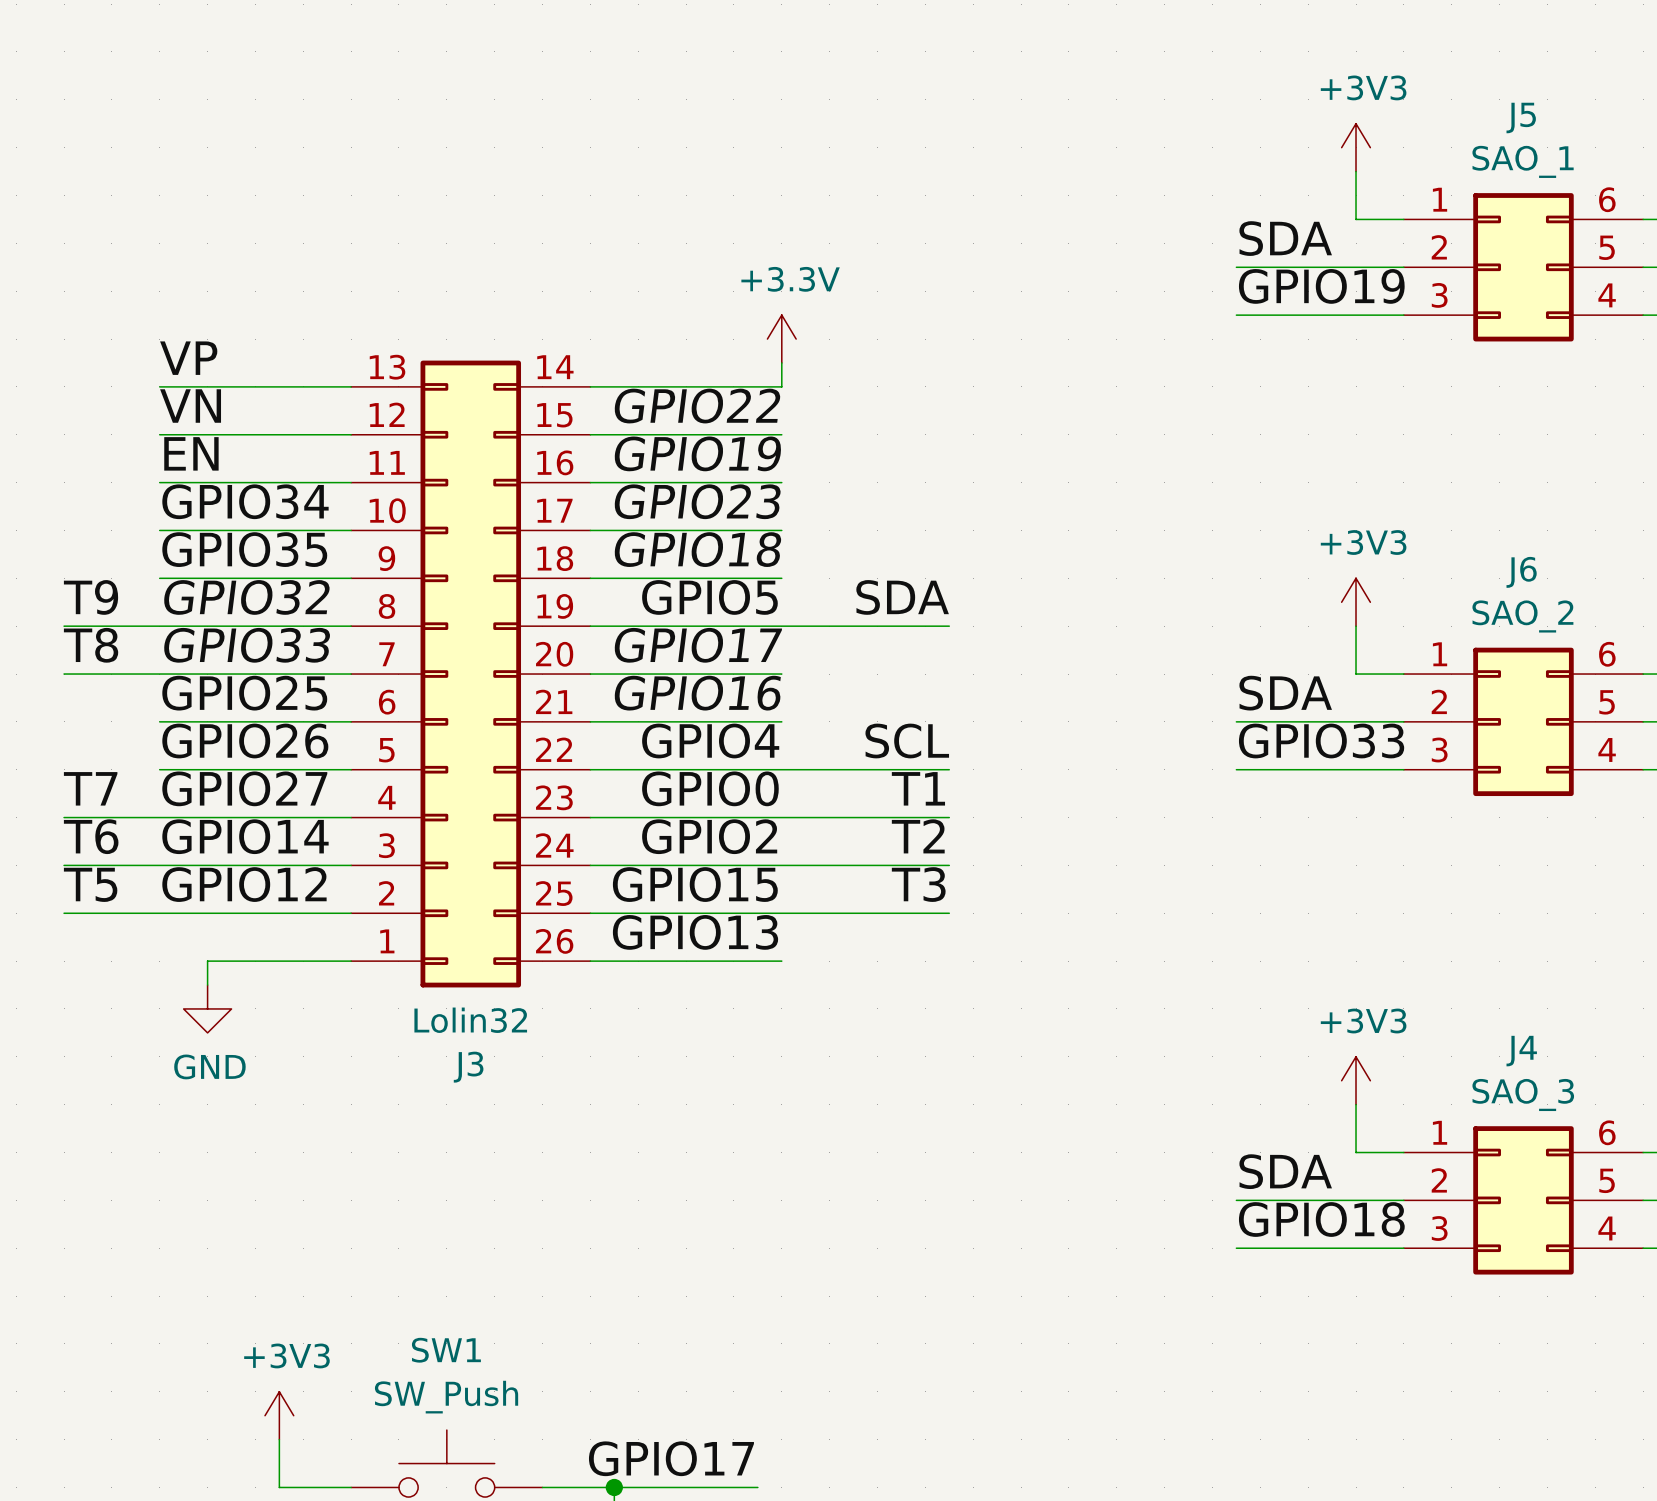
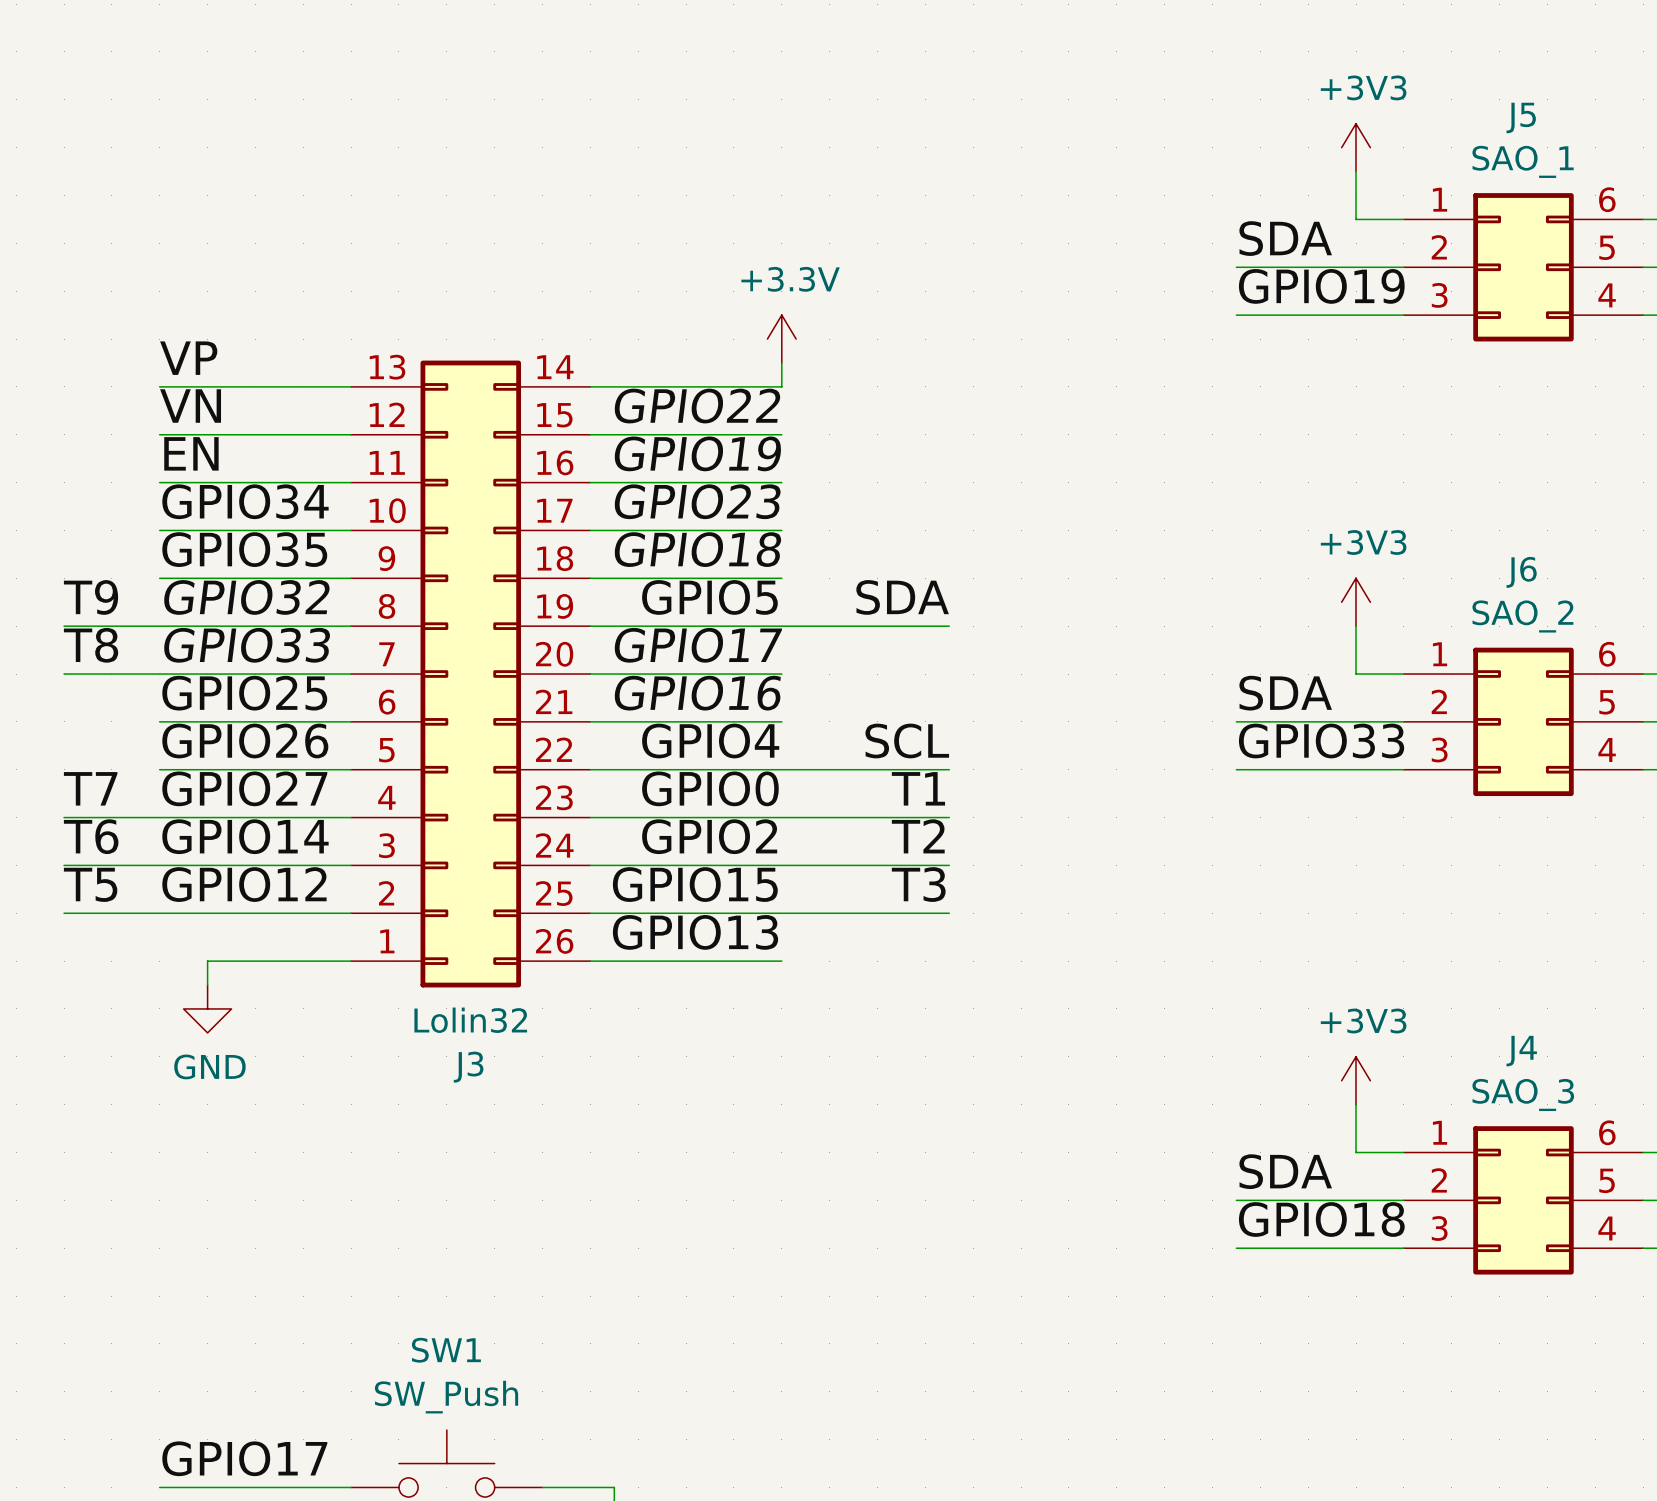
power symbol: +3V3 (279, 1415) -> none
wire: (279, 1439) (279, 1487) -> (159, 1487) (279, 1487)
label: none -> GPIO17 (244, 1458)
label: GPIO17 (671, 1458) -> none
wire: (614, 1487) (757, 1487) -> none
junction: (614, 1487) -> none

